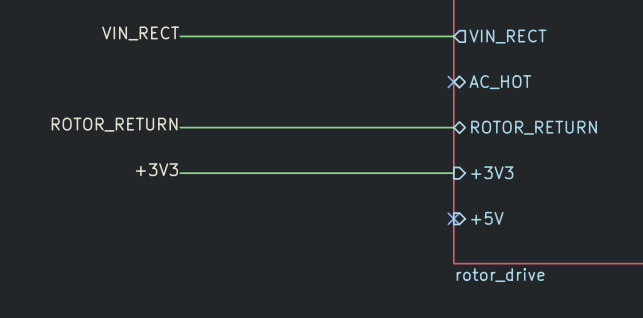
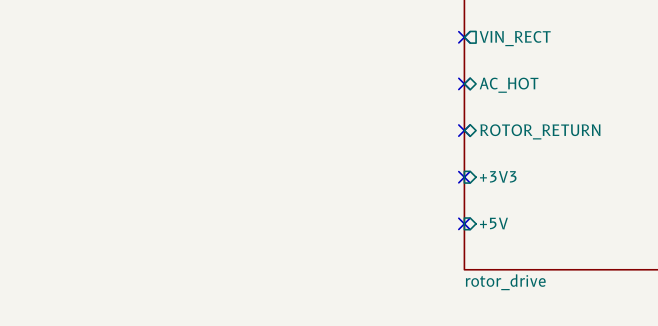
label: VIN_RECT (140, 33) -> none
wire: (180, 36) (453, 36) -> none
no-connect mark: none -> (464, 37)
label: ROTOR_RETURN (114, 124) -> none
wire: (180, 127) (453, 127) -> none
no-connect mark: none -> (464, 130)
label: +3V3 (156, 169) -> none
wire: (180, 173) (453, 173) -> none
no-connect mark: none -> (464, 177)

